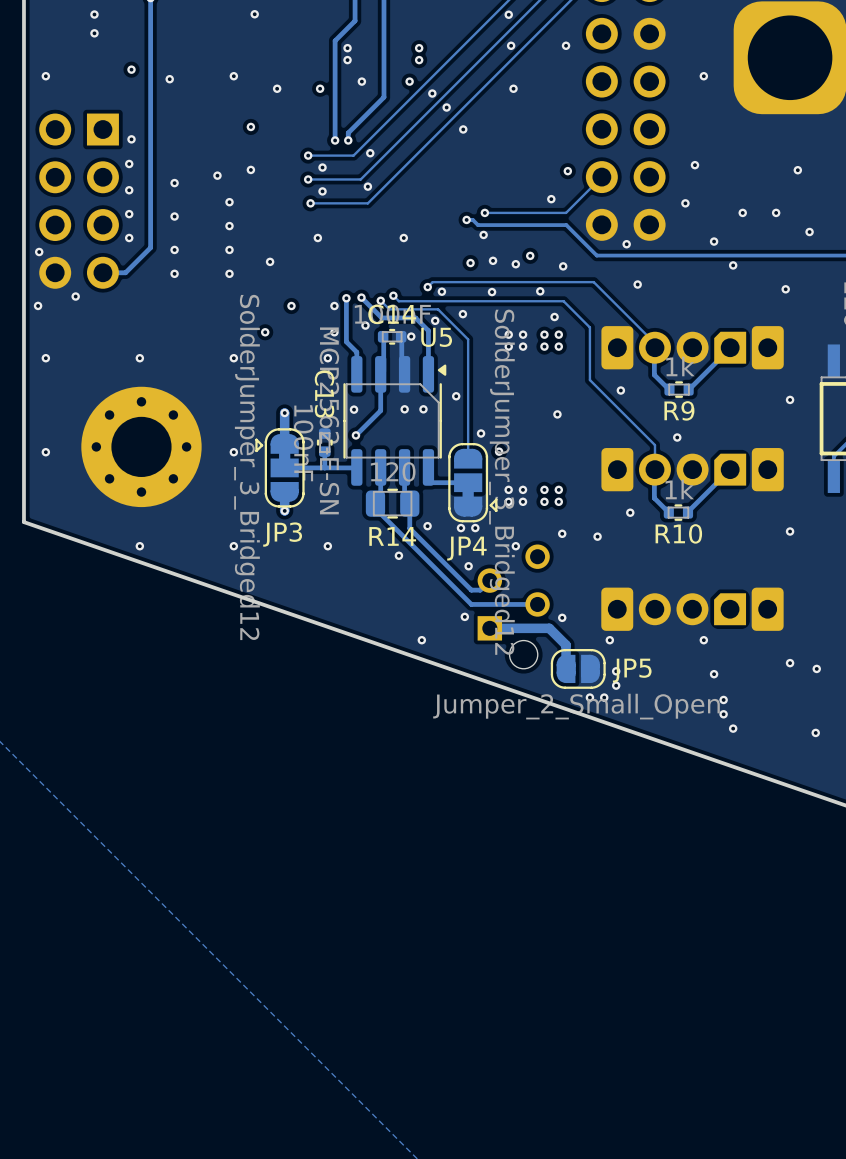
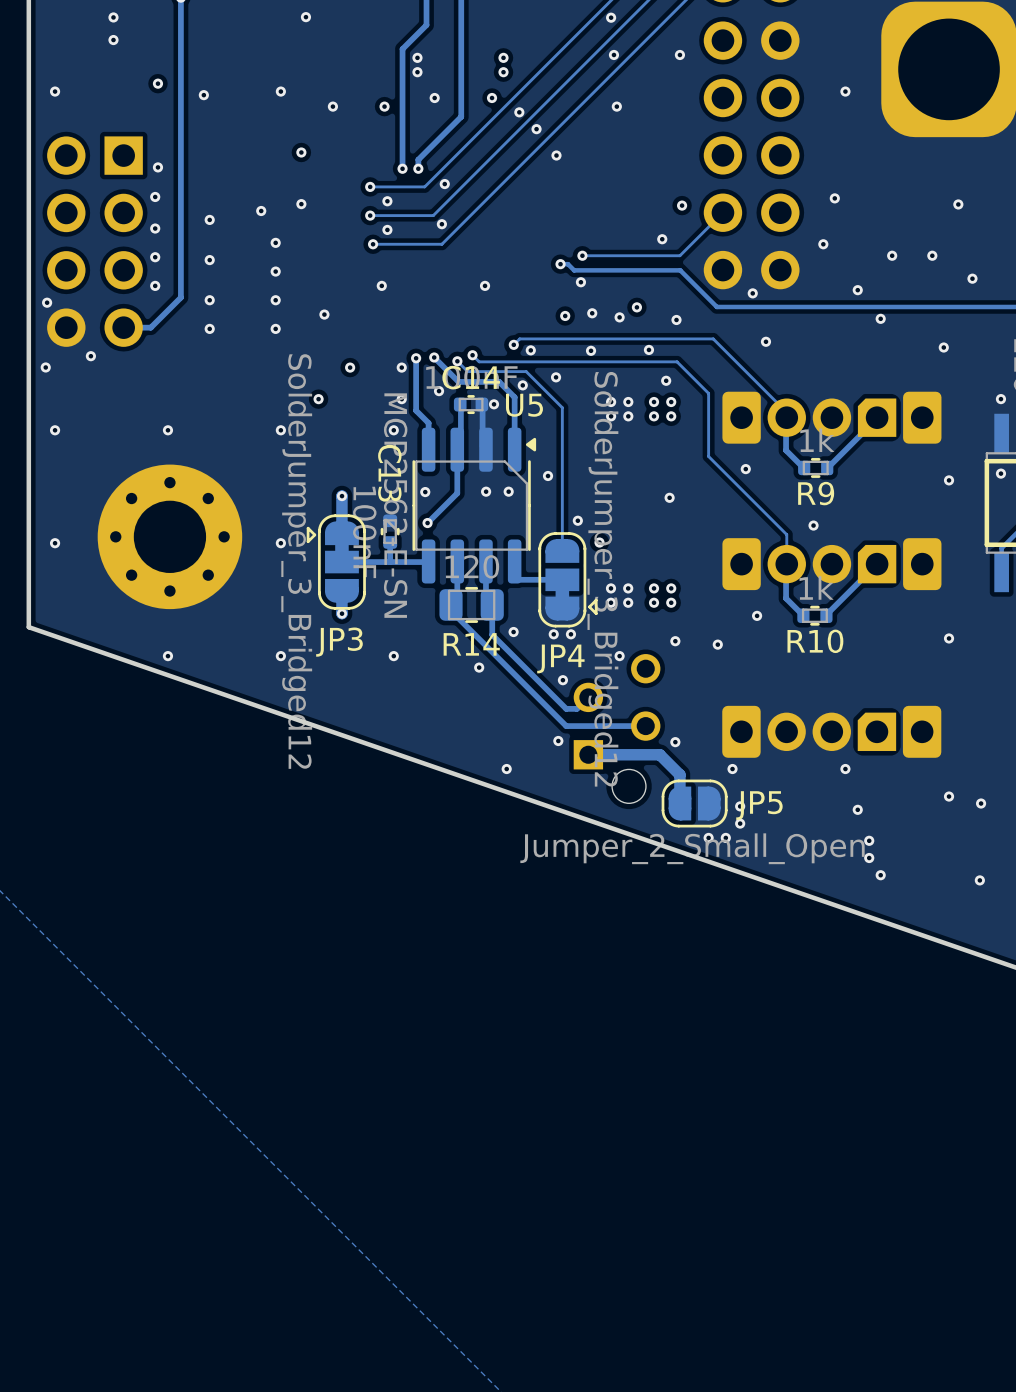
via: none -> (1000, 399)
via: none -> (1000, 473)

